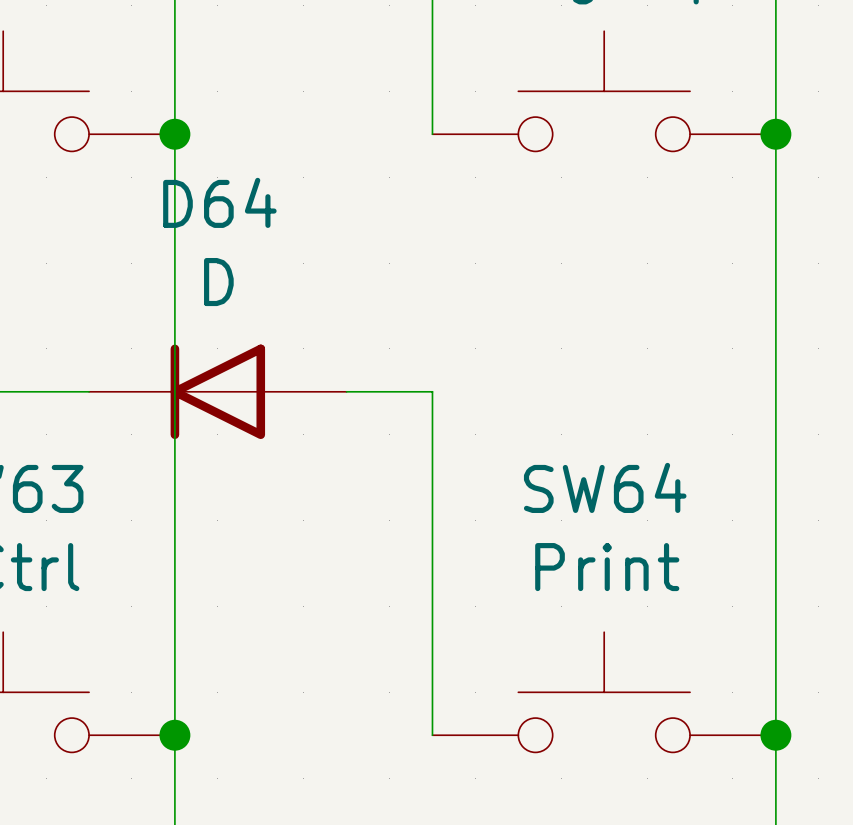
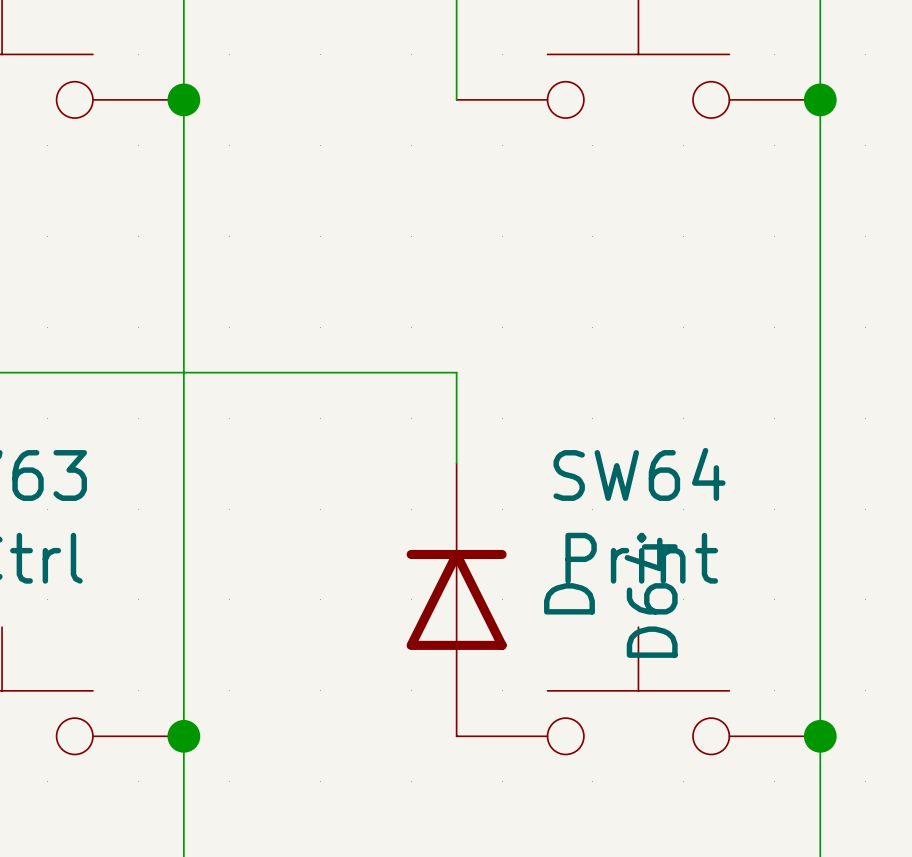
D64 rotation: 0° (217, 391) -> 90° clockwise (456, 599)
D64 position: (217, 391) -> (456, 599)

